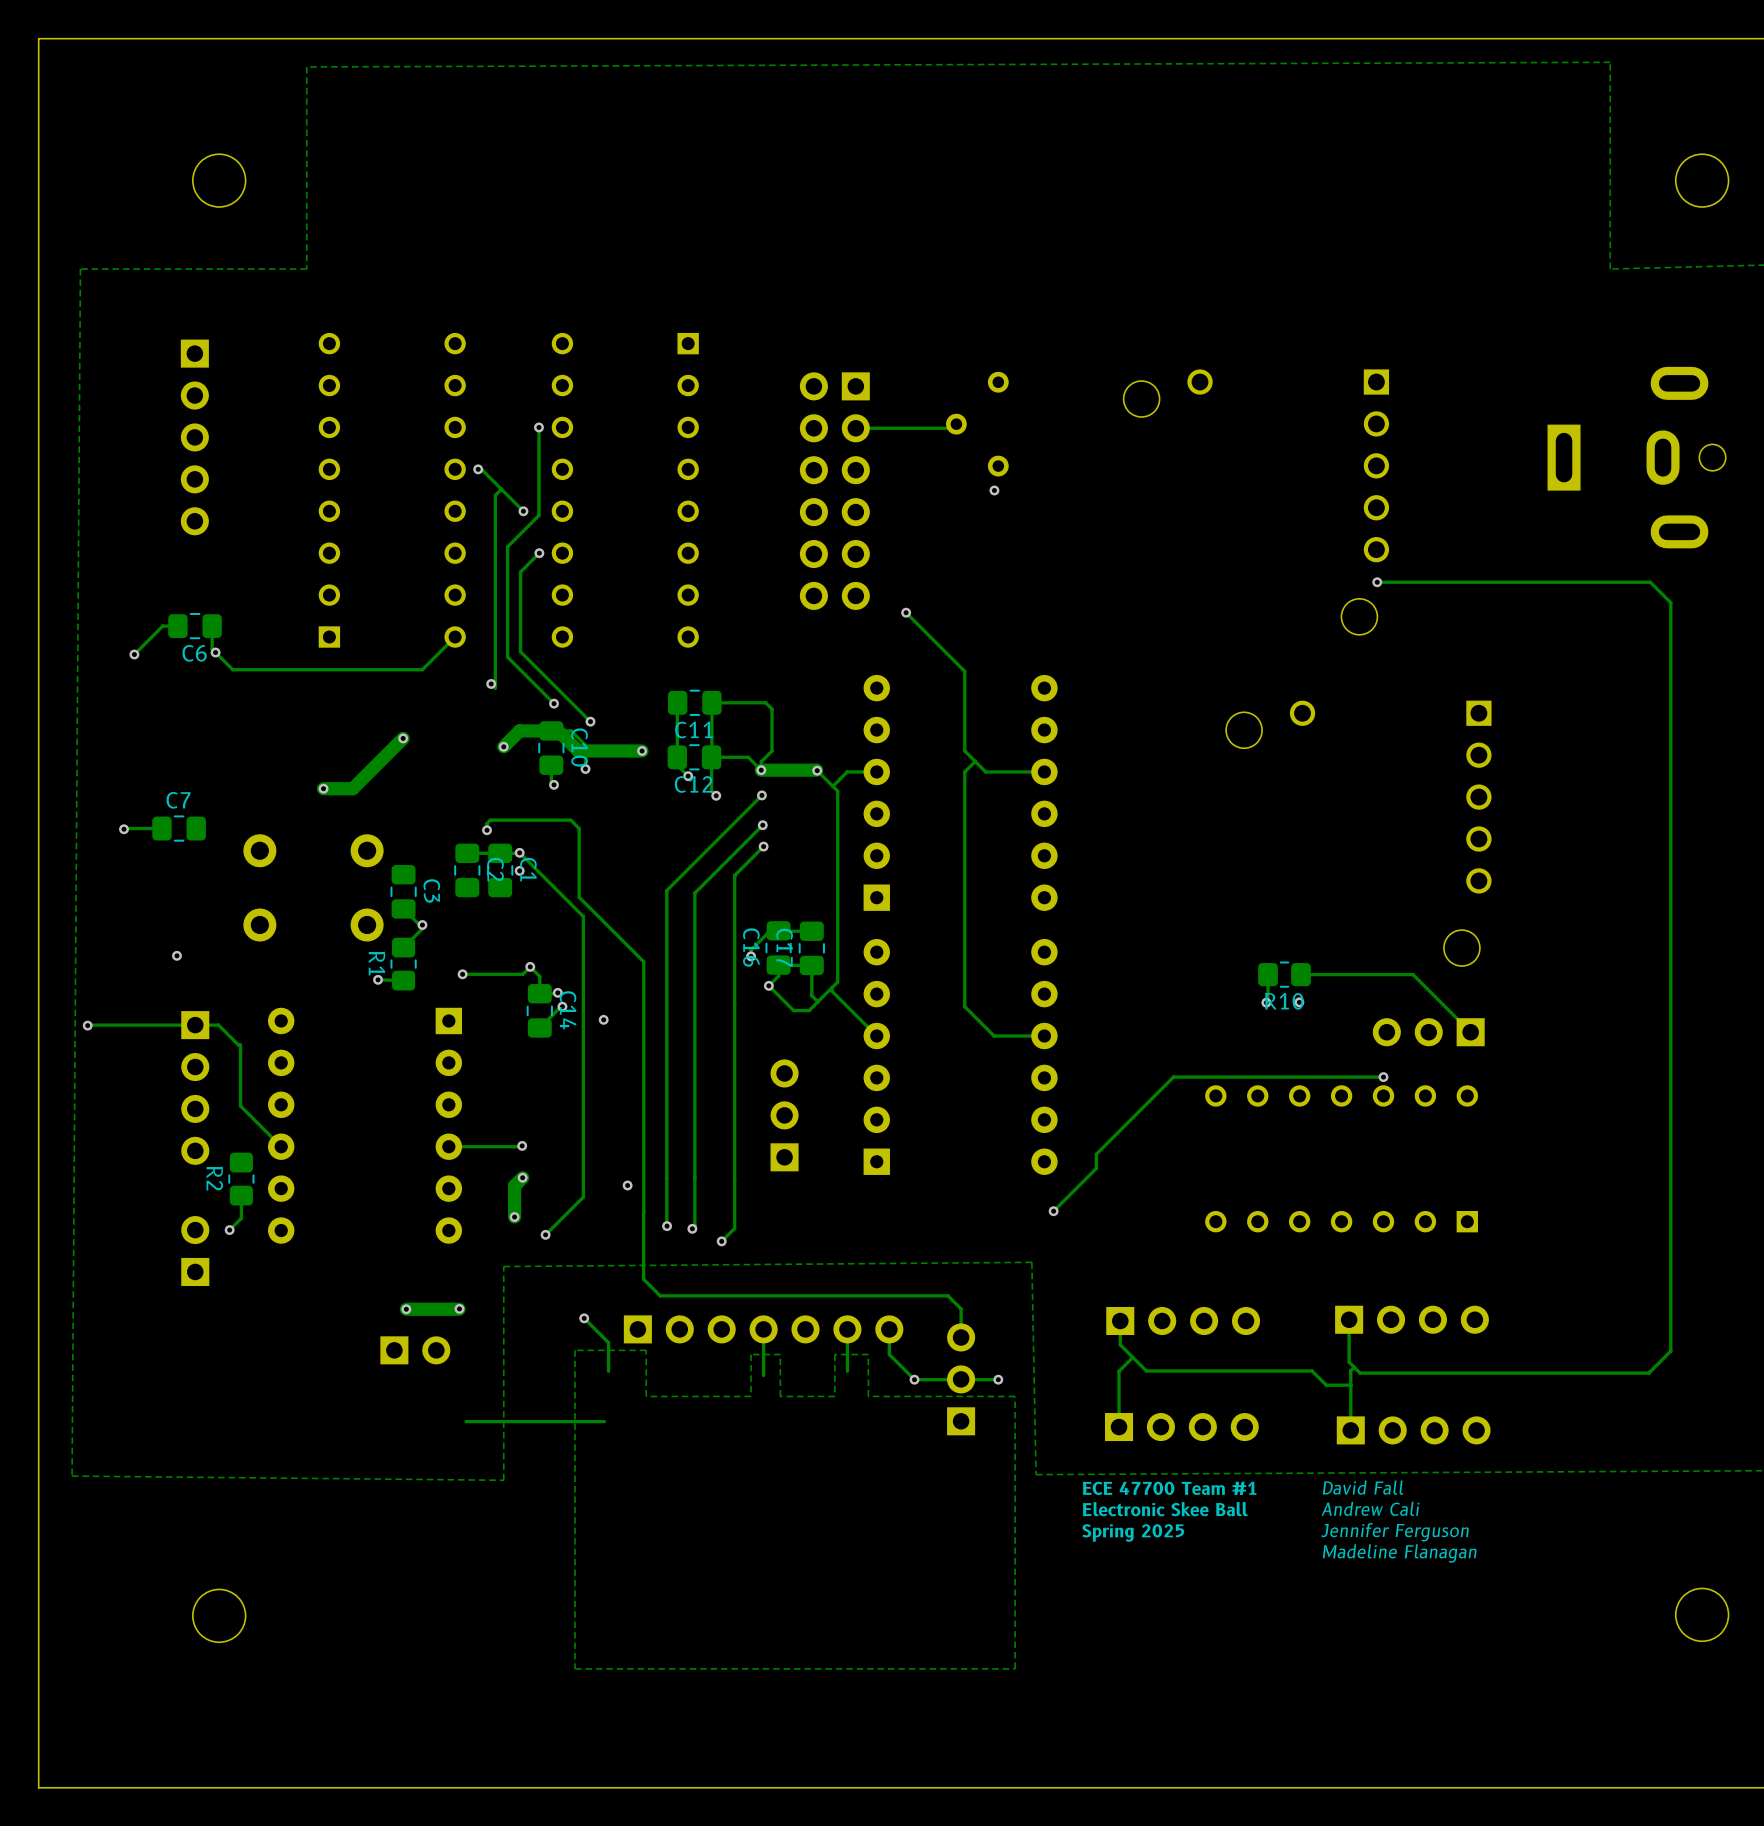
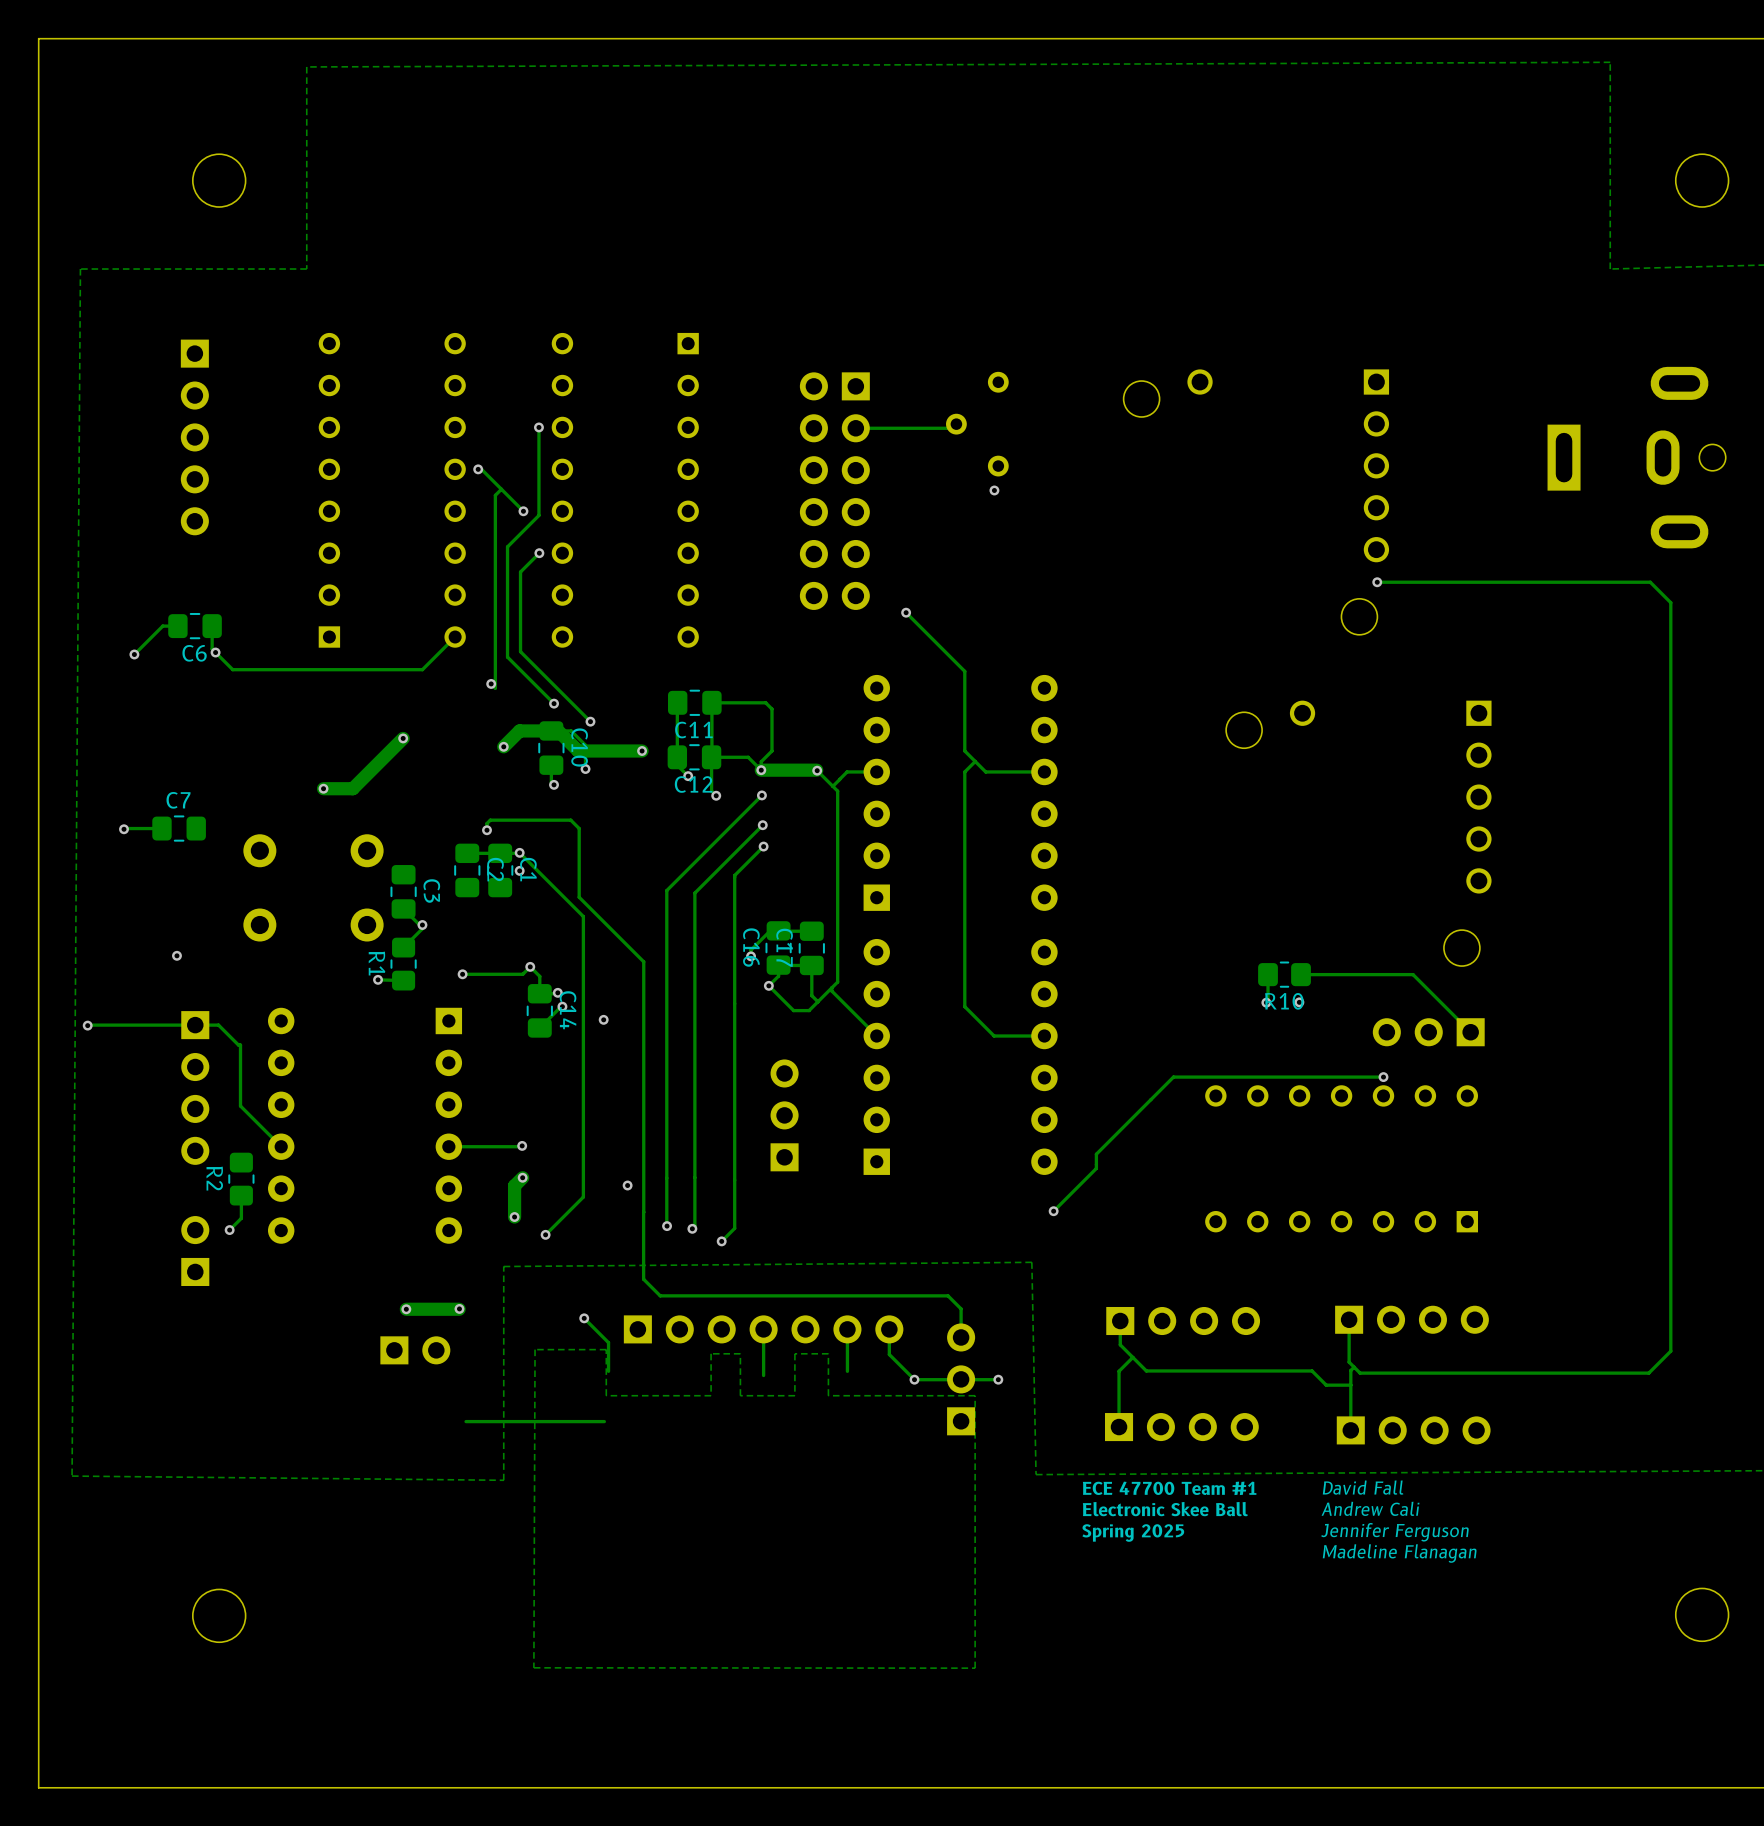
zone outline: (646, 1350) (646, 1396) (751, 1396) (751, 1354) (780, 1354) (780, 1396) (834, 1396) (834, 1354) (868, 1354) (868, 1396) (1015, 1396) (1015, 1668) (575, 1668) (575, 1350) (646, 1350) -> (606, 1349) (606, 1395) (711, 1395) (711, 1353) (740, 1353) (740, 1395) (794, 1395) (794, 1353) (828, 1353) (828, 1395) (975, 1395) (975, 1668) (533, 1667) (535, 1349) (606, 1349)

